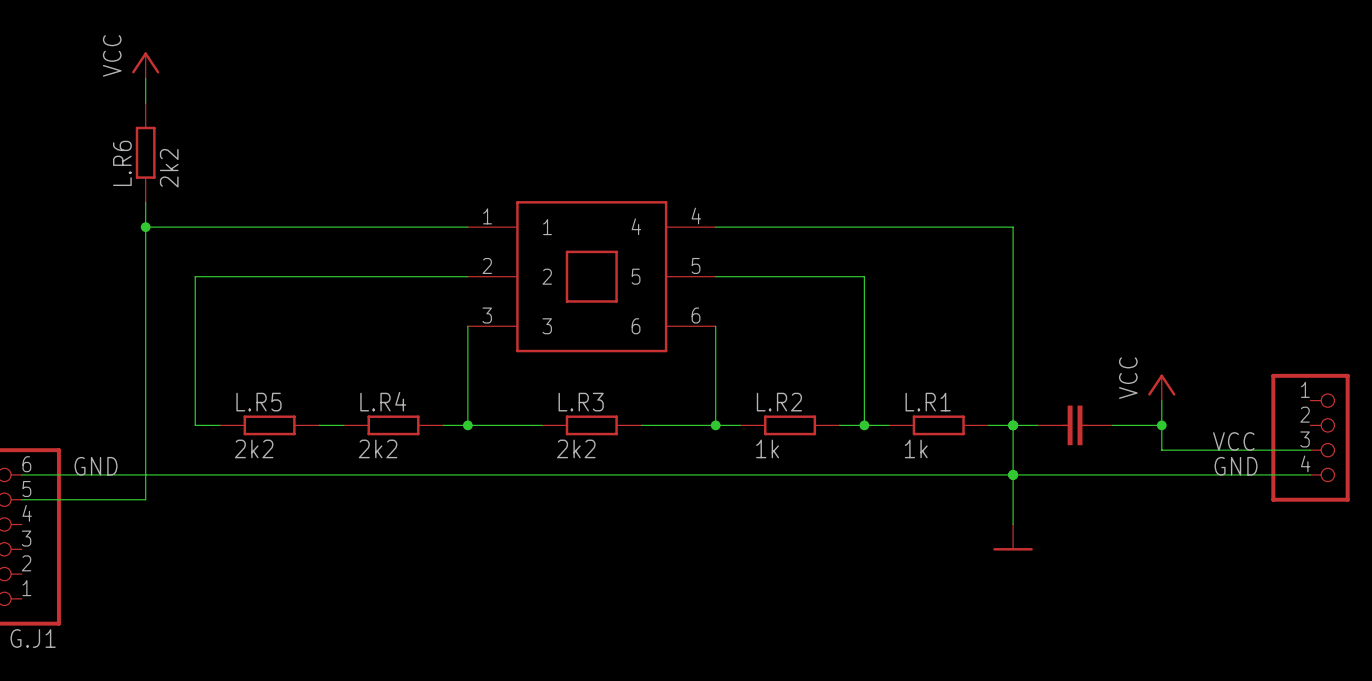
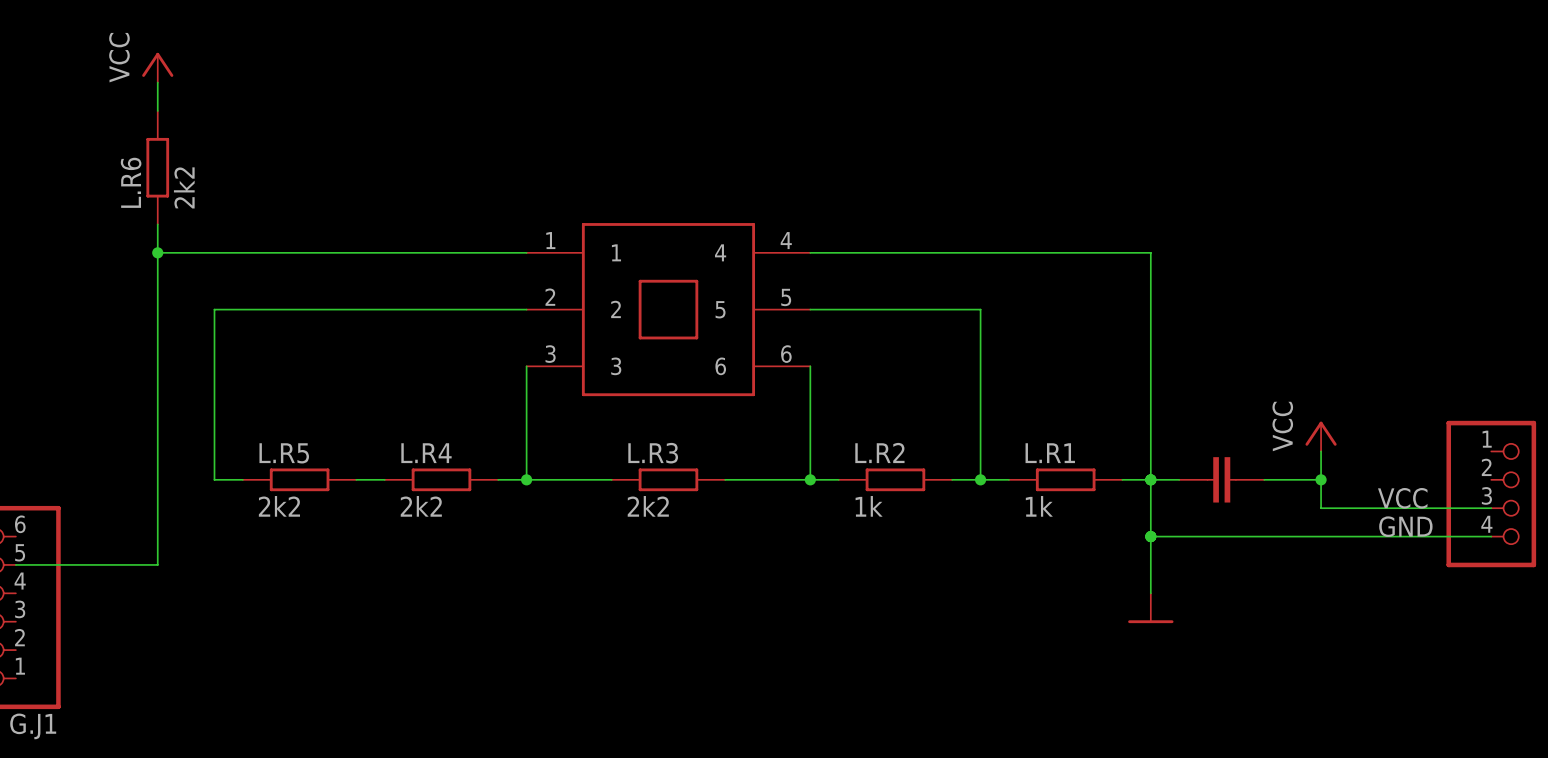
label: GND (96, 466) -> none
wire: (21, 474) (1013, 474) -> none

